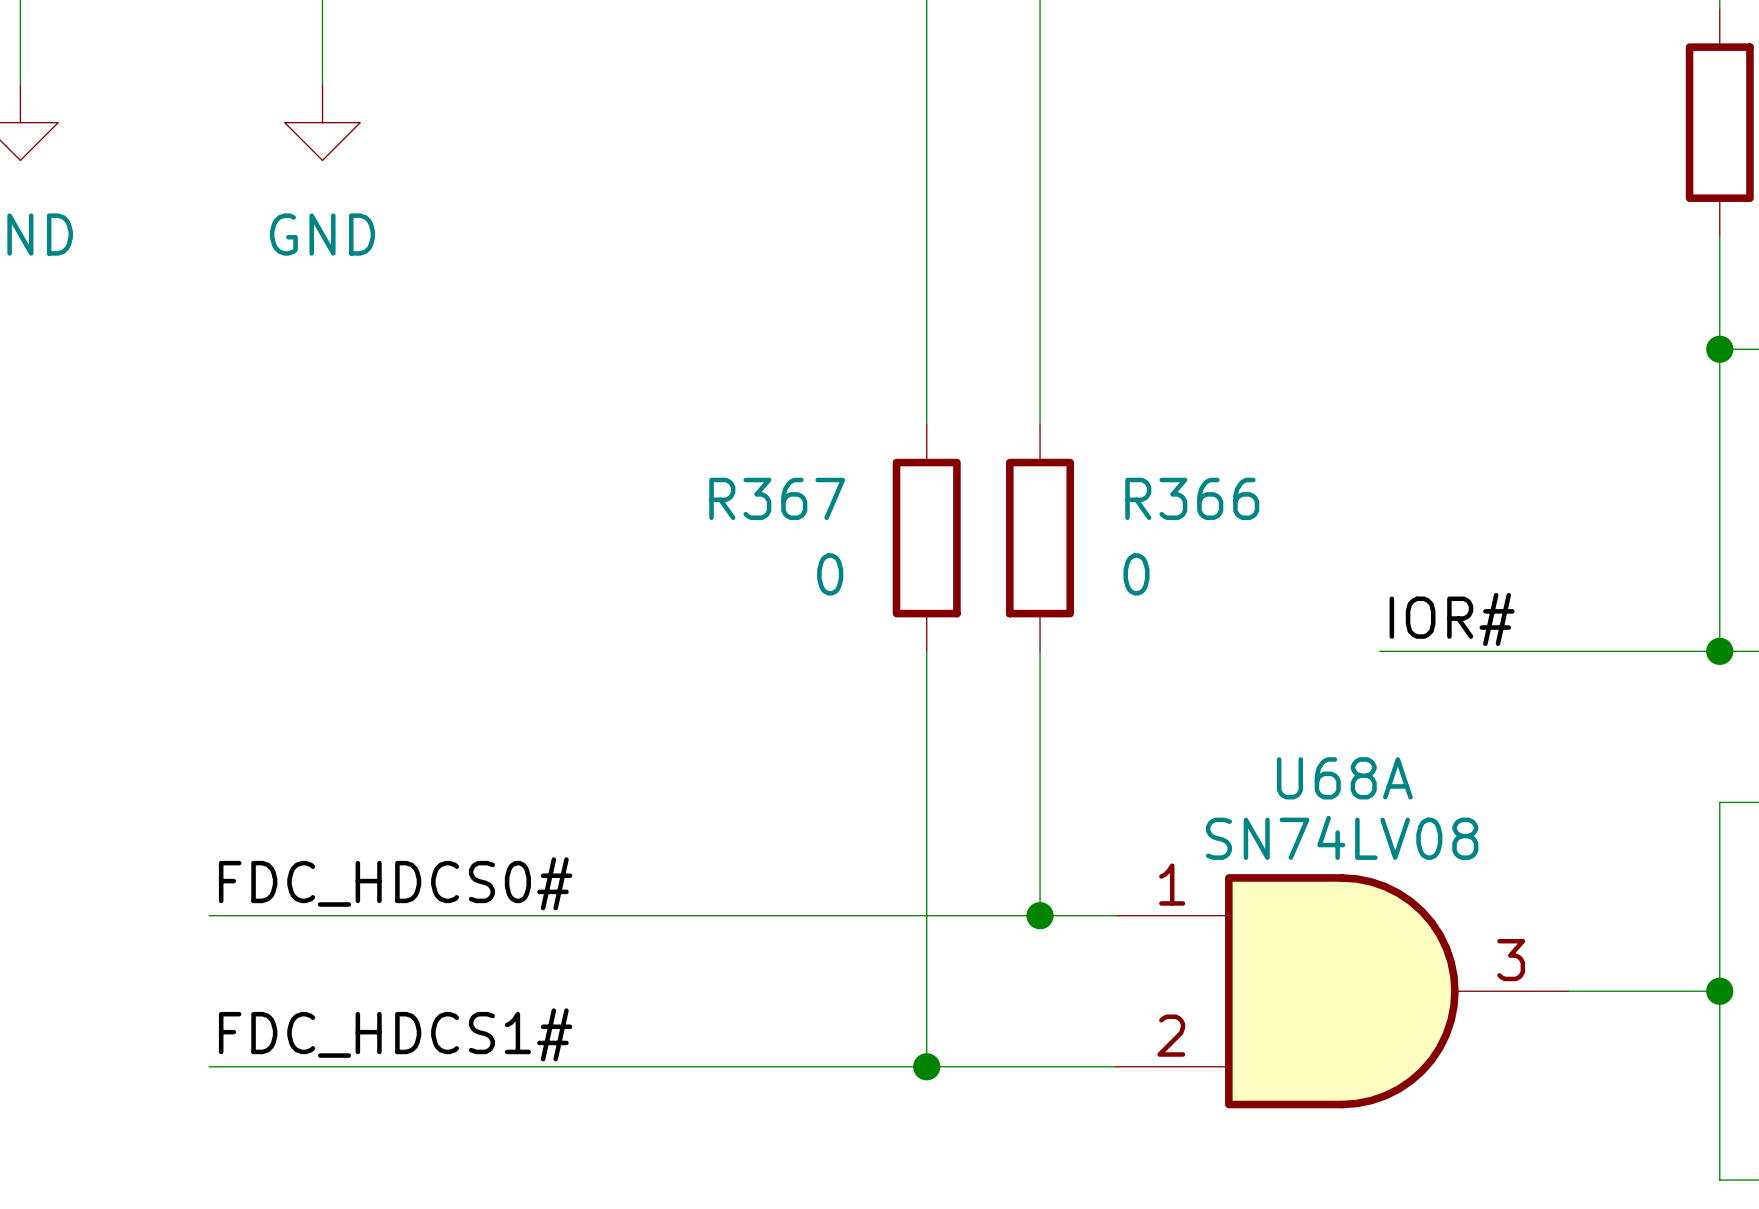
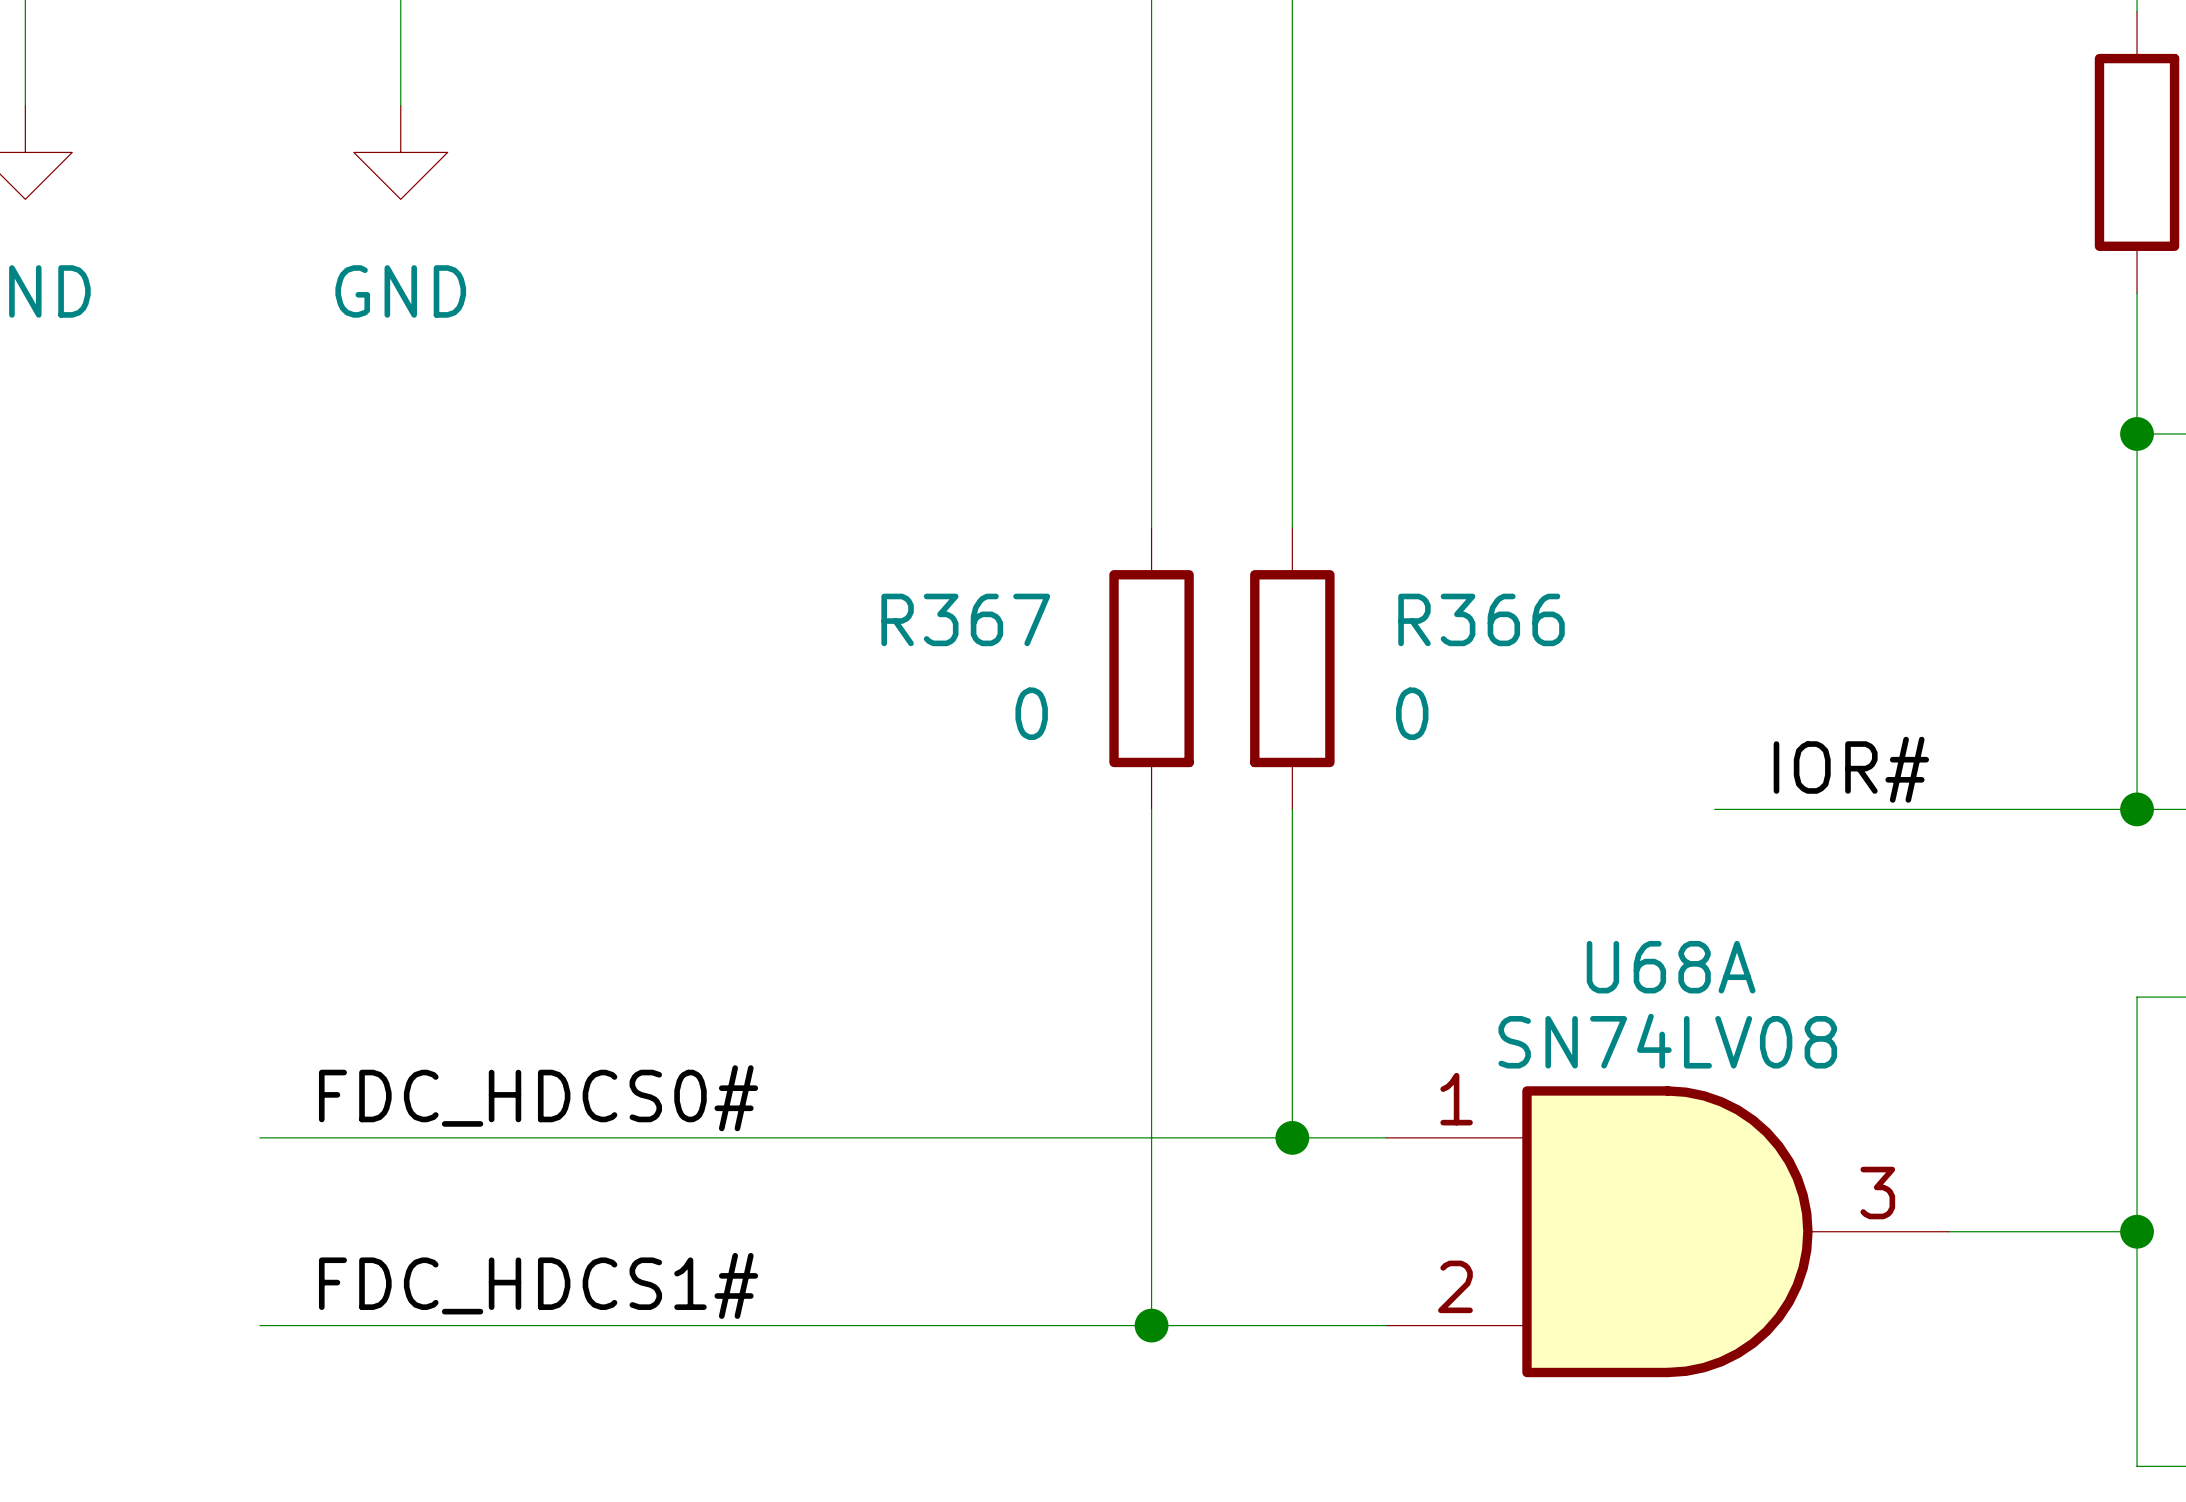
label position: IOR# (1452, 619) -> IOR# (1851, 769)
label position: FDC_HDCS0# (395, 883) -> FDC_HDCS0# (538, 1098)
label position: FDC_HDCS1# (395, 1034) -> FDC_HDCS1# (538, 1285)

